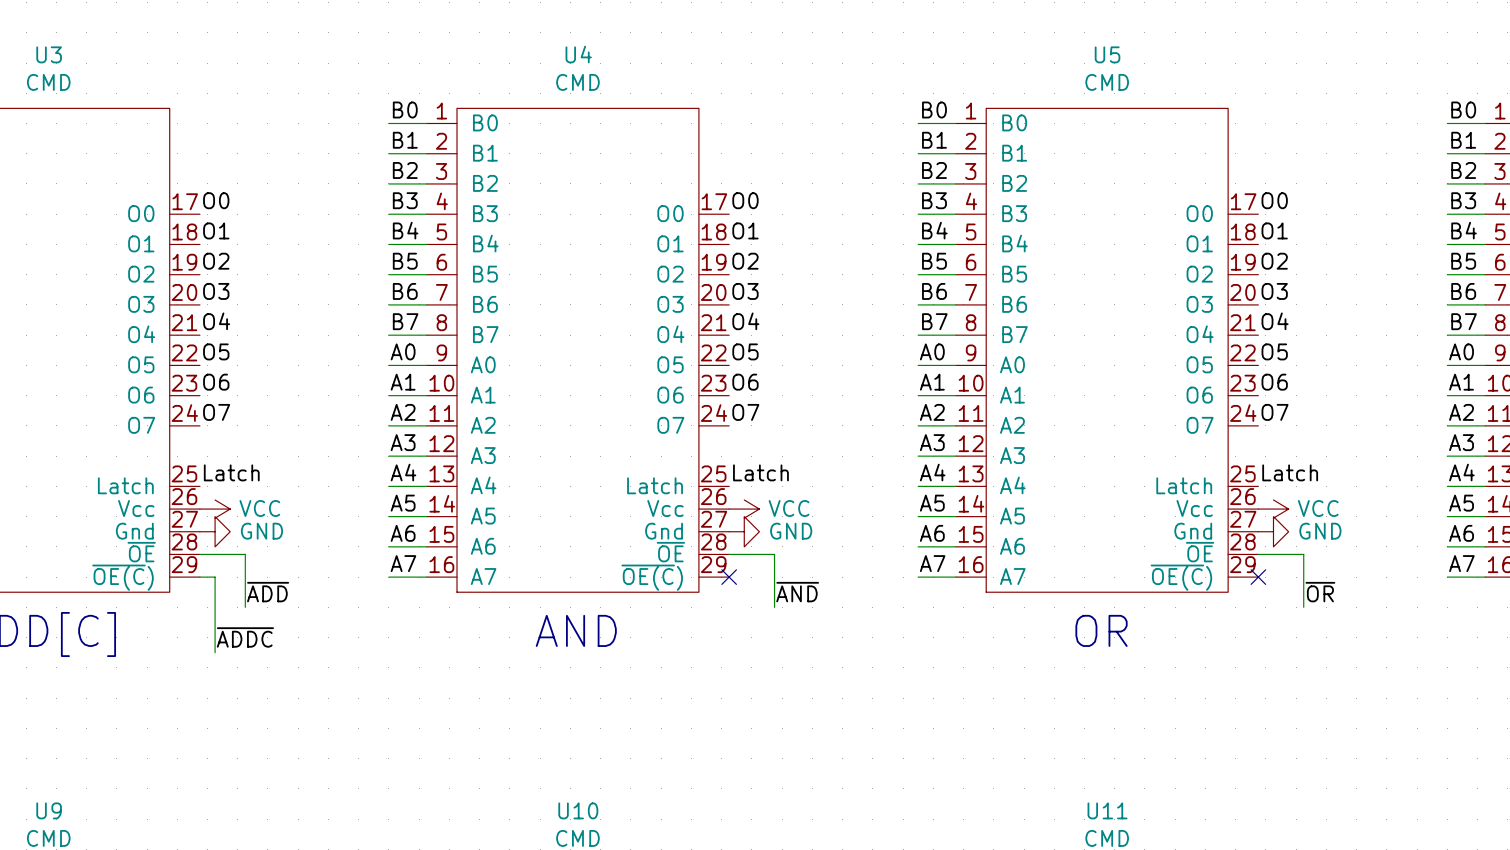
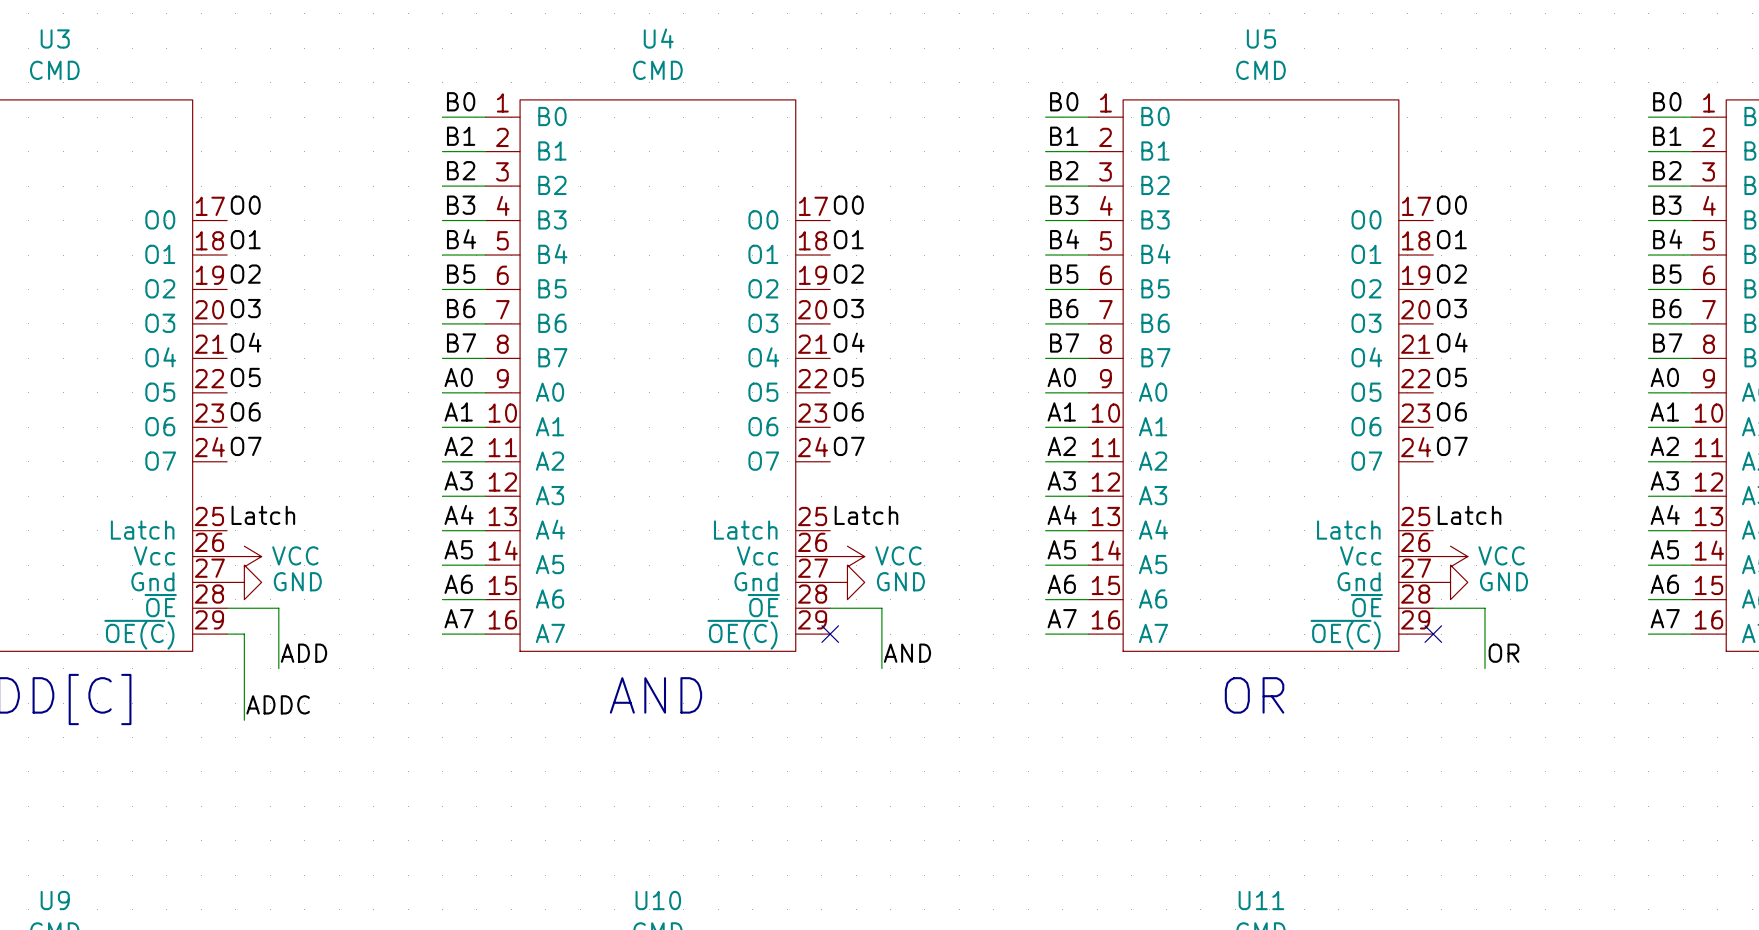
label: ~{ADD} (268, 592) -> ADD (303, 653)
label: ~{AND} (797, 592) -> AND (907, 653)
label: ~{OR} (1320, 592) -> OR (1504, 653)
label: ~{ADDC} (245, 637) -> ADDC (278, 704)

